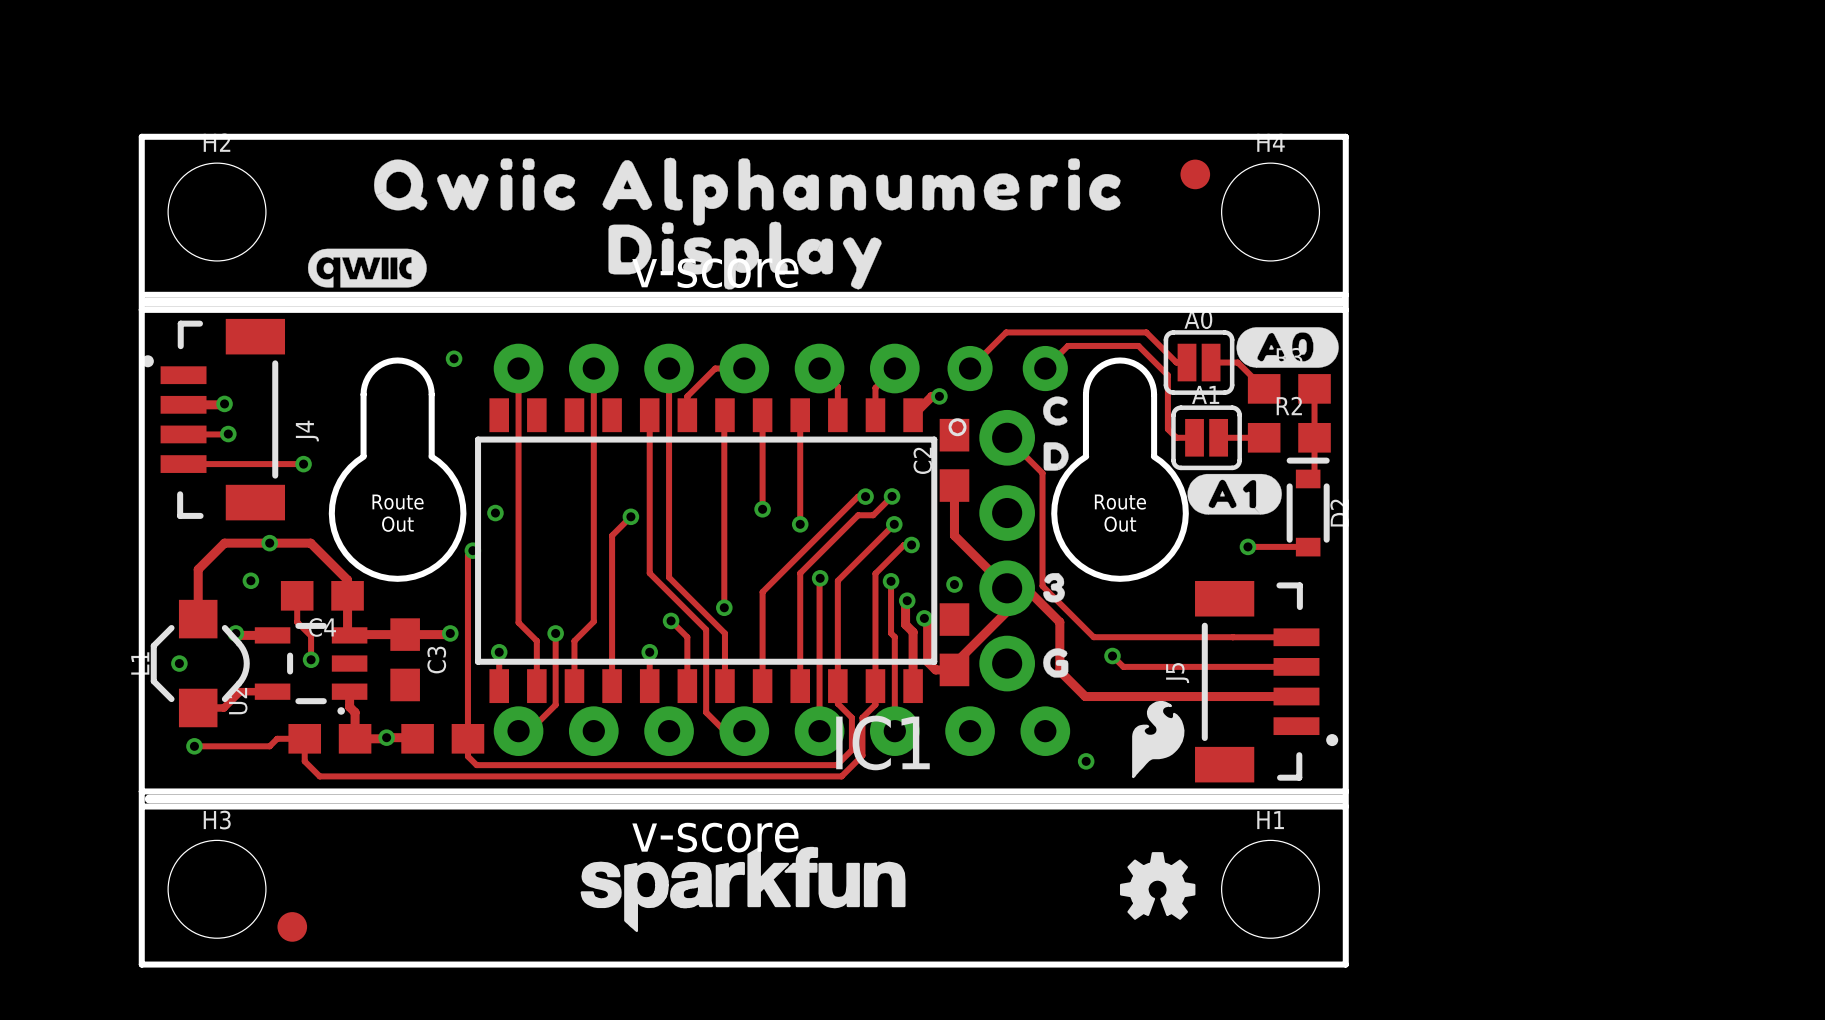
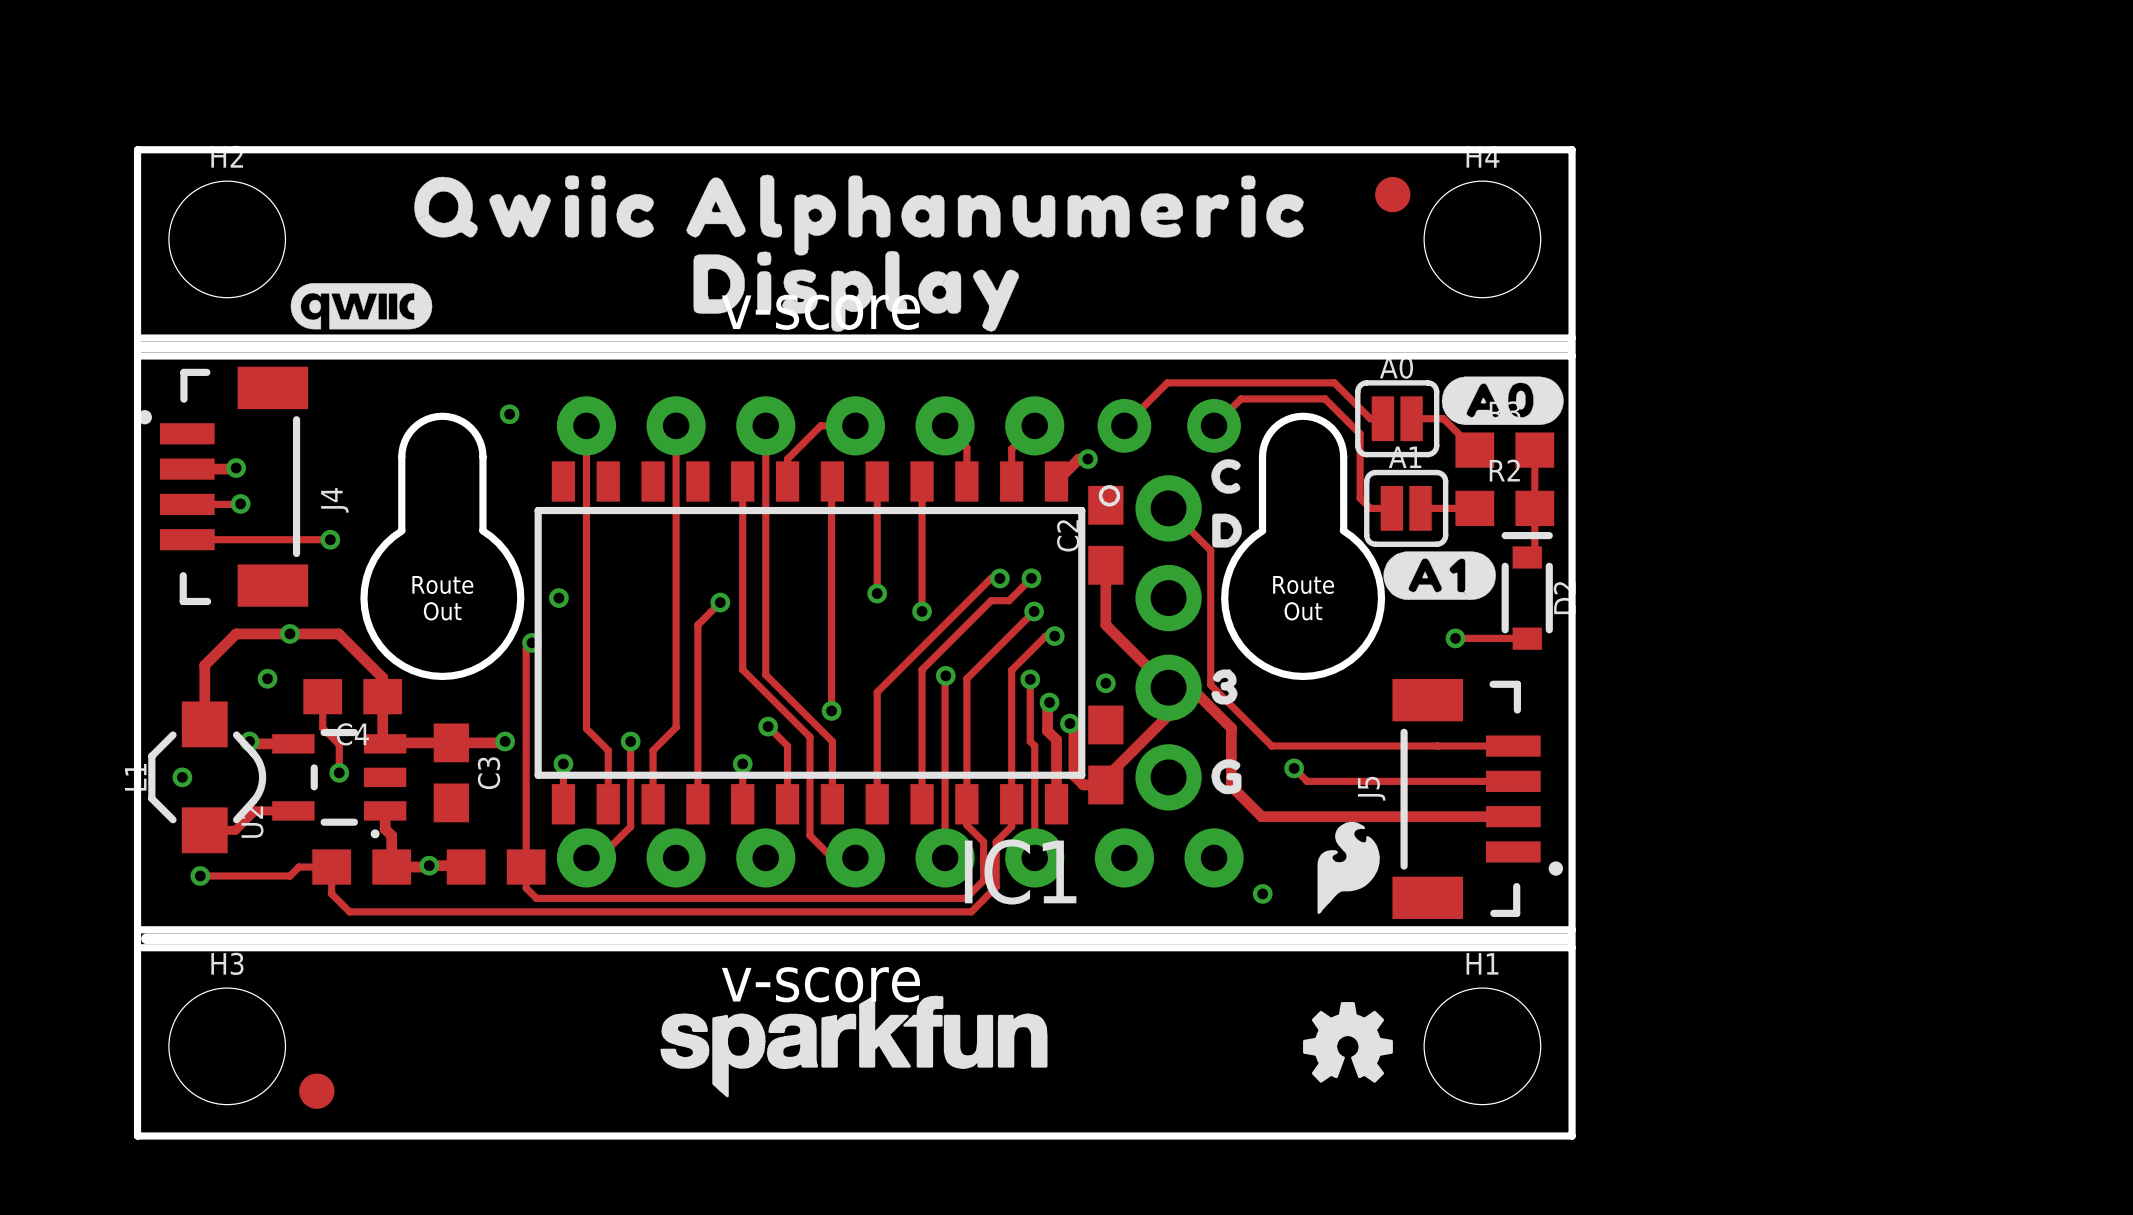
drawing position: (367, 268) -> (361, 306)

